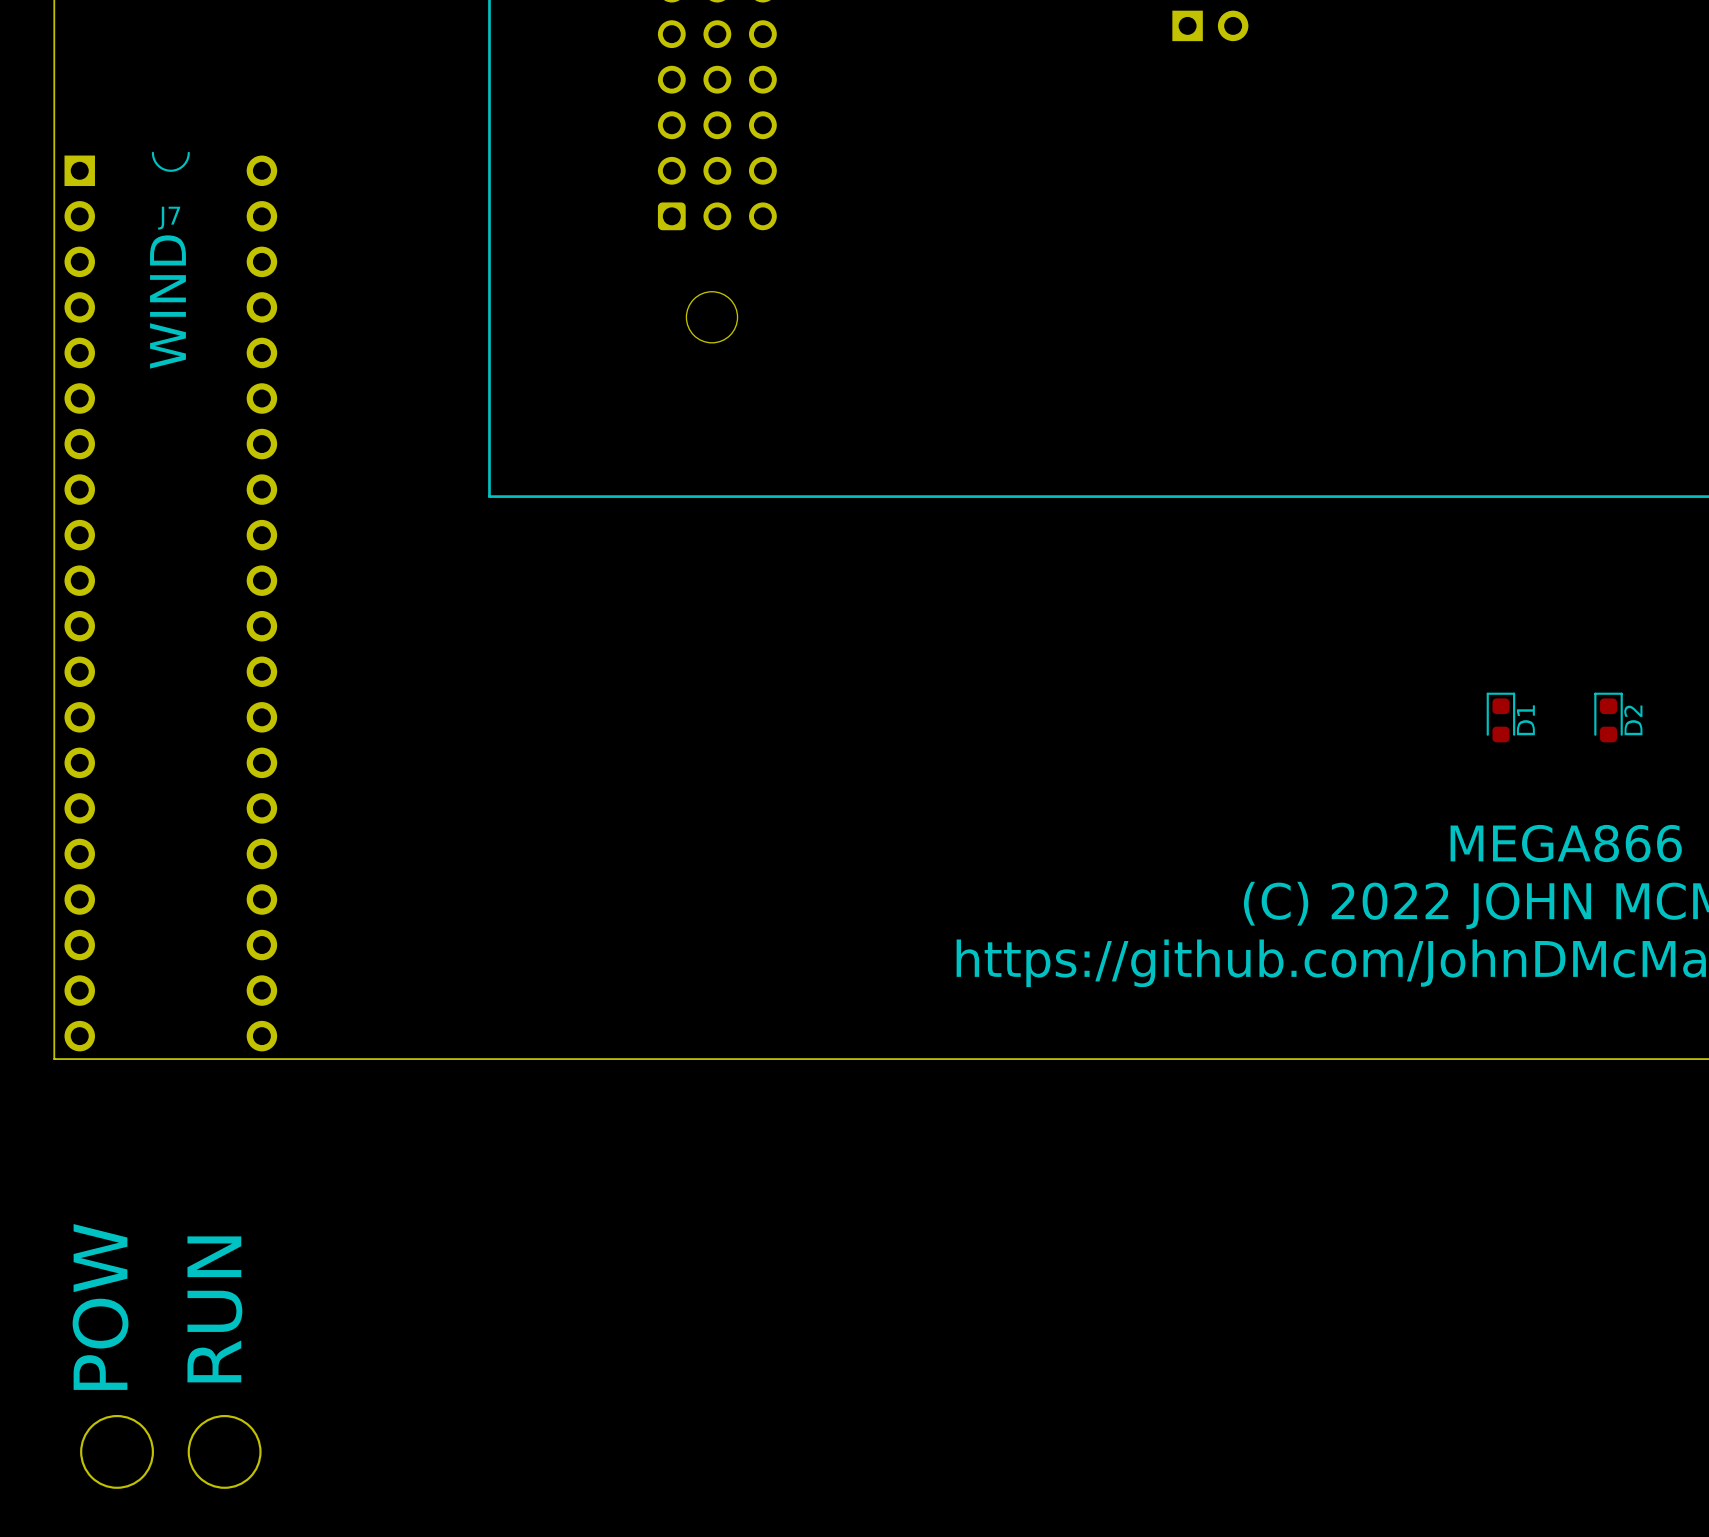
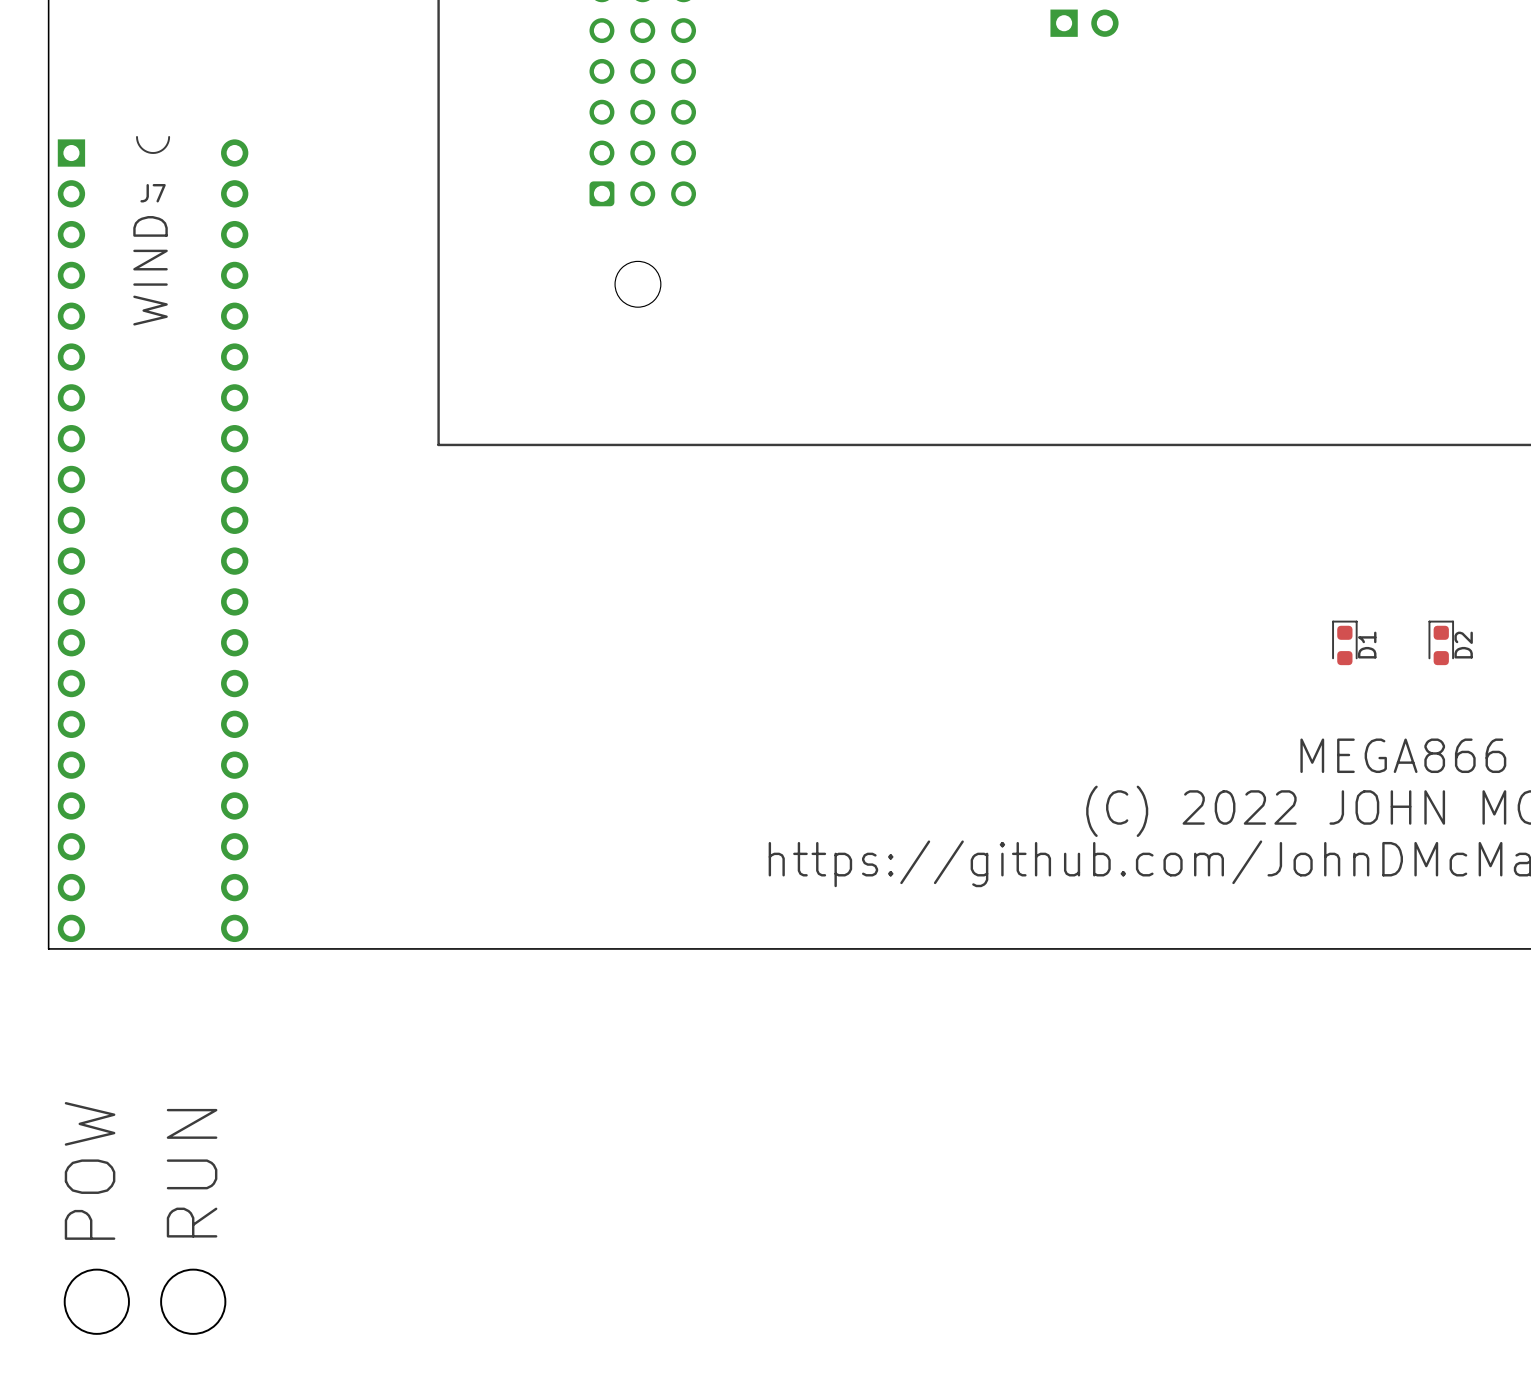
J7 footprint: [64, 151, 278, 1489] -> [57, 135, 249, 1335]

